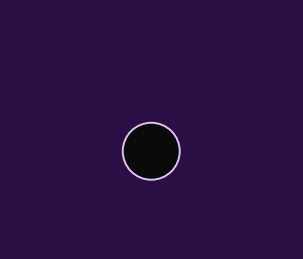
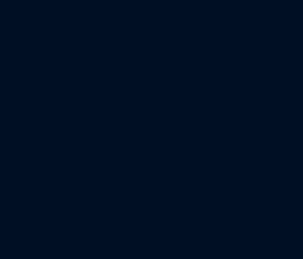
part: (151, 151) -> none

